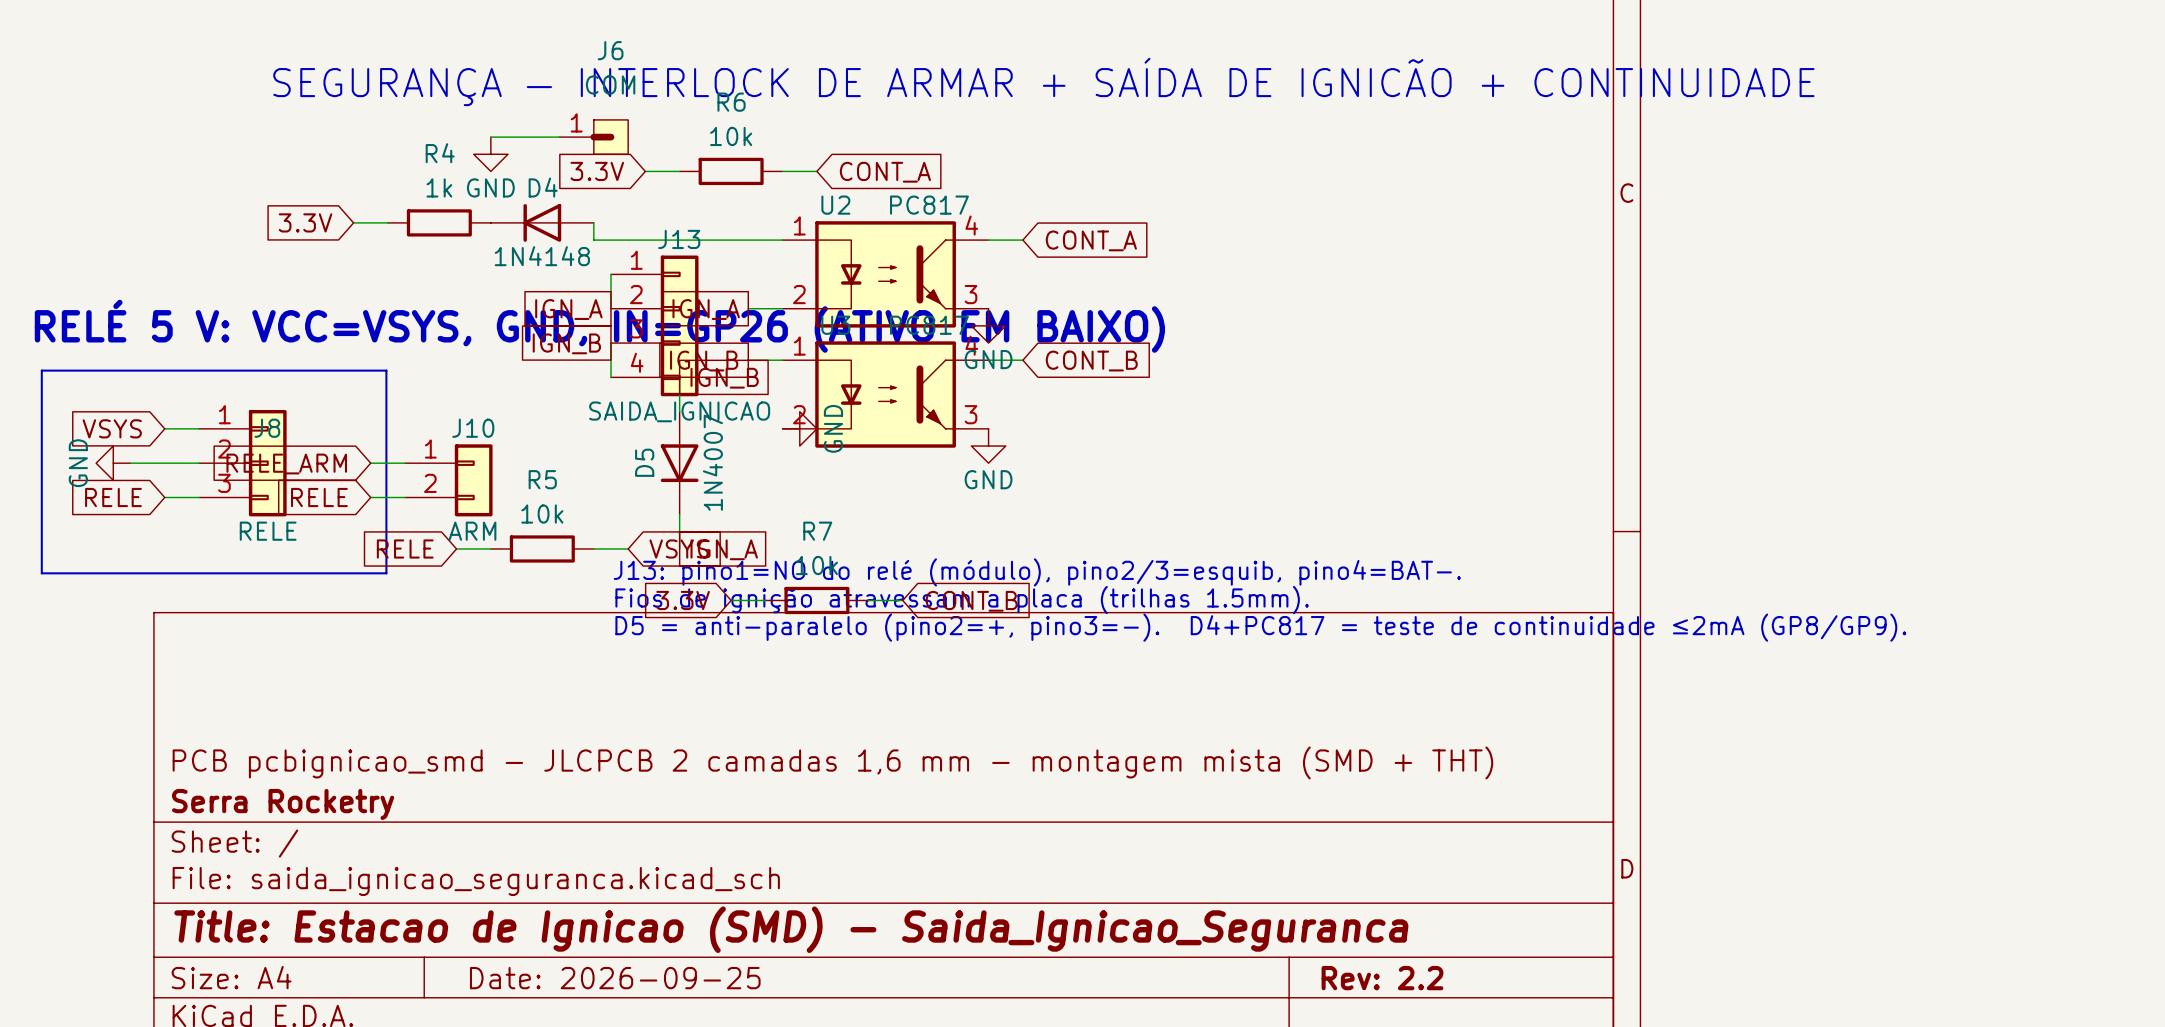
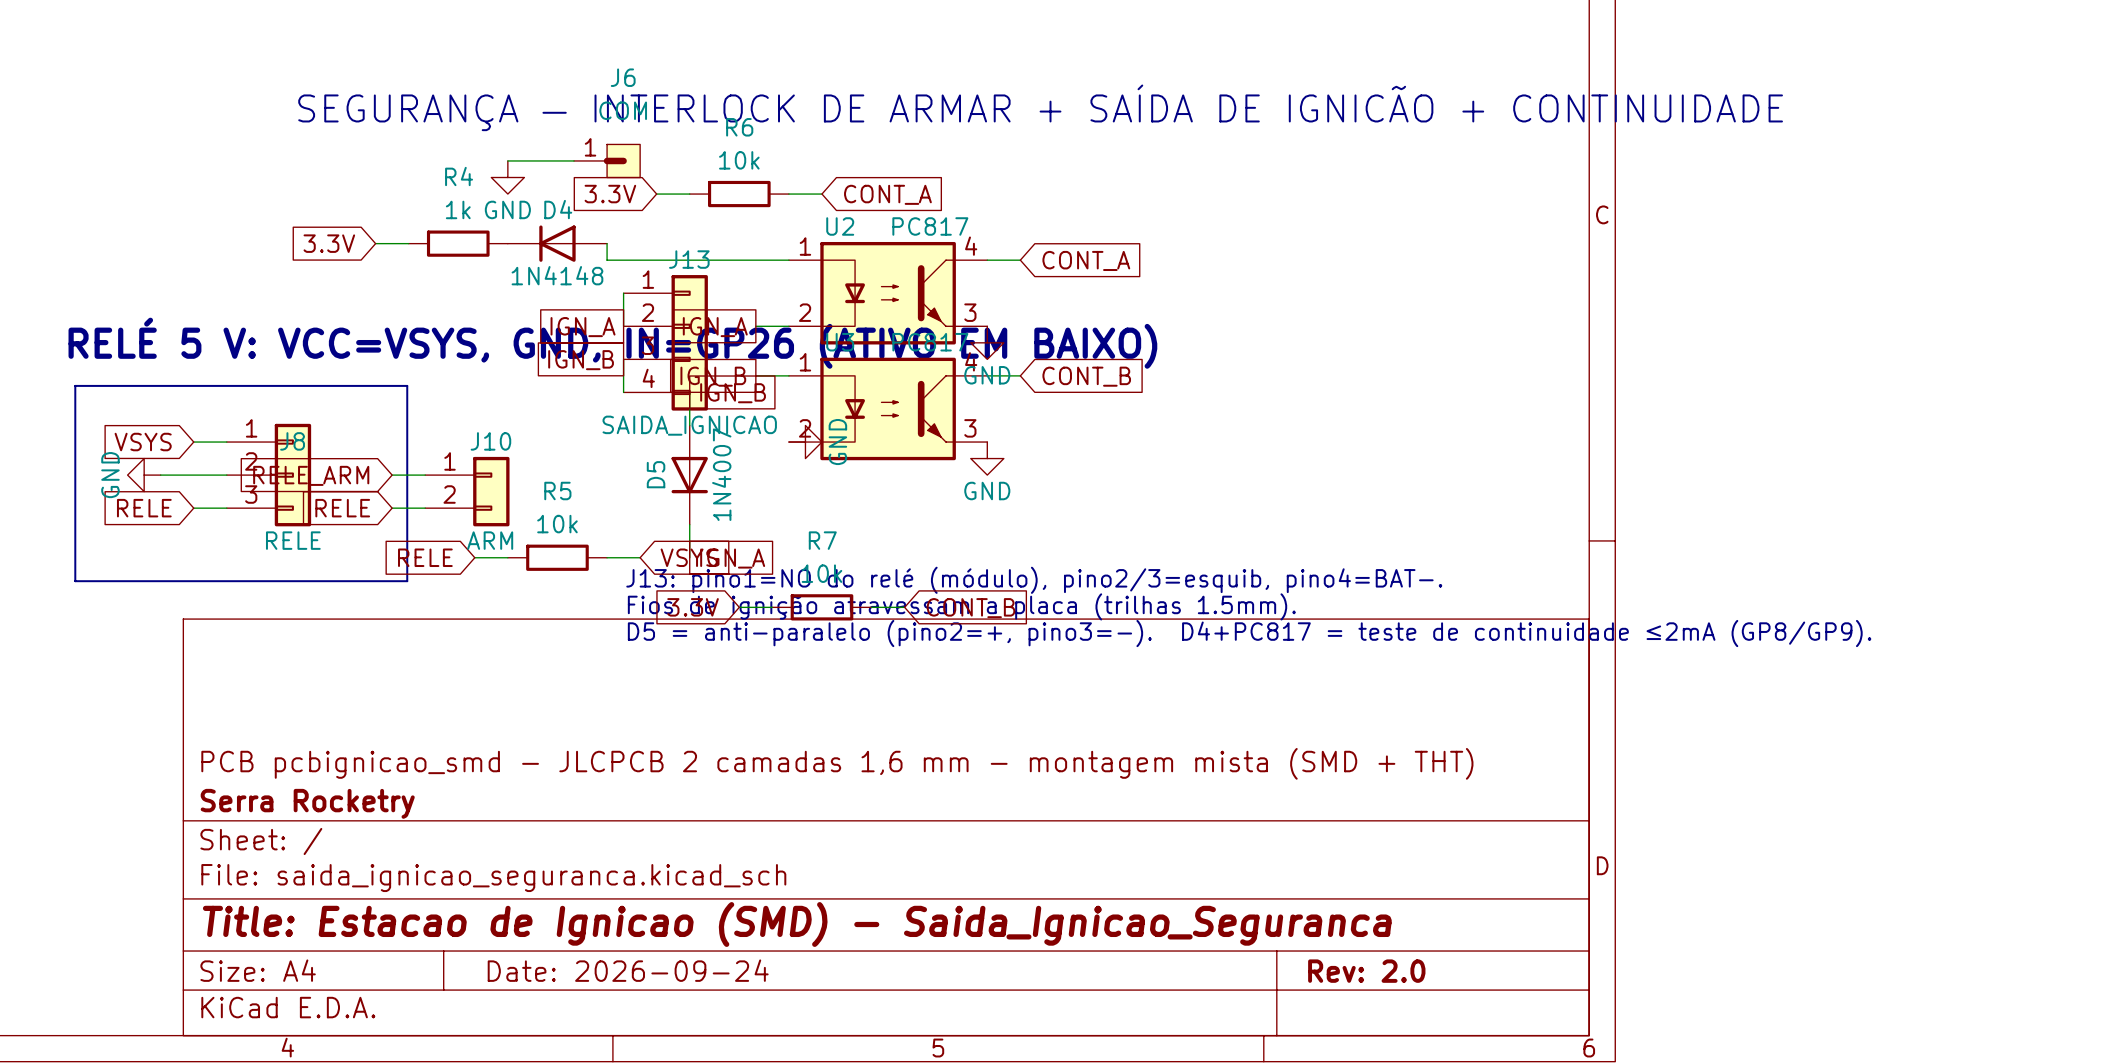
title block: Date: 2026-09-25 (615, 978) -> Date: 2026-09-24 (628, 970)
title block: Rev: 2.2 (1382, 978) -> Rev: 2.0 (1366, 971)

